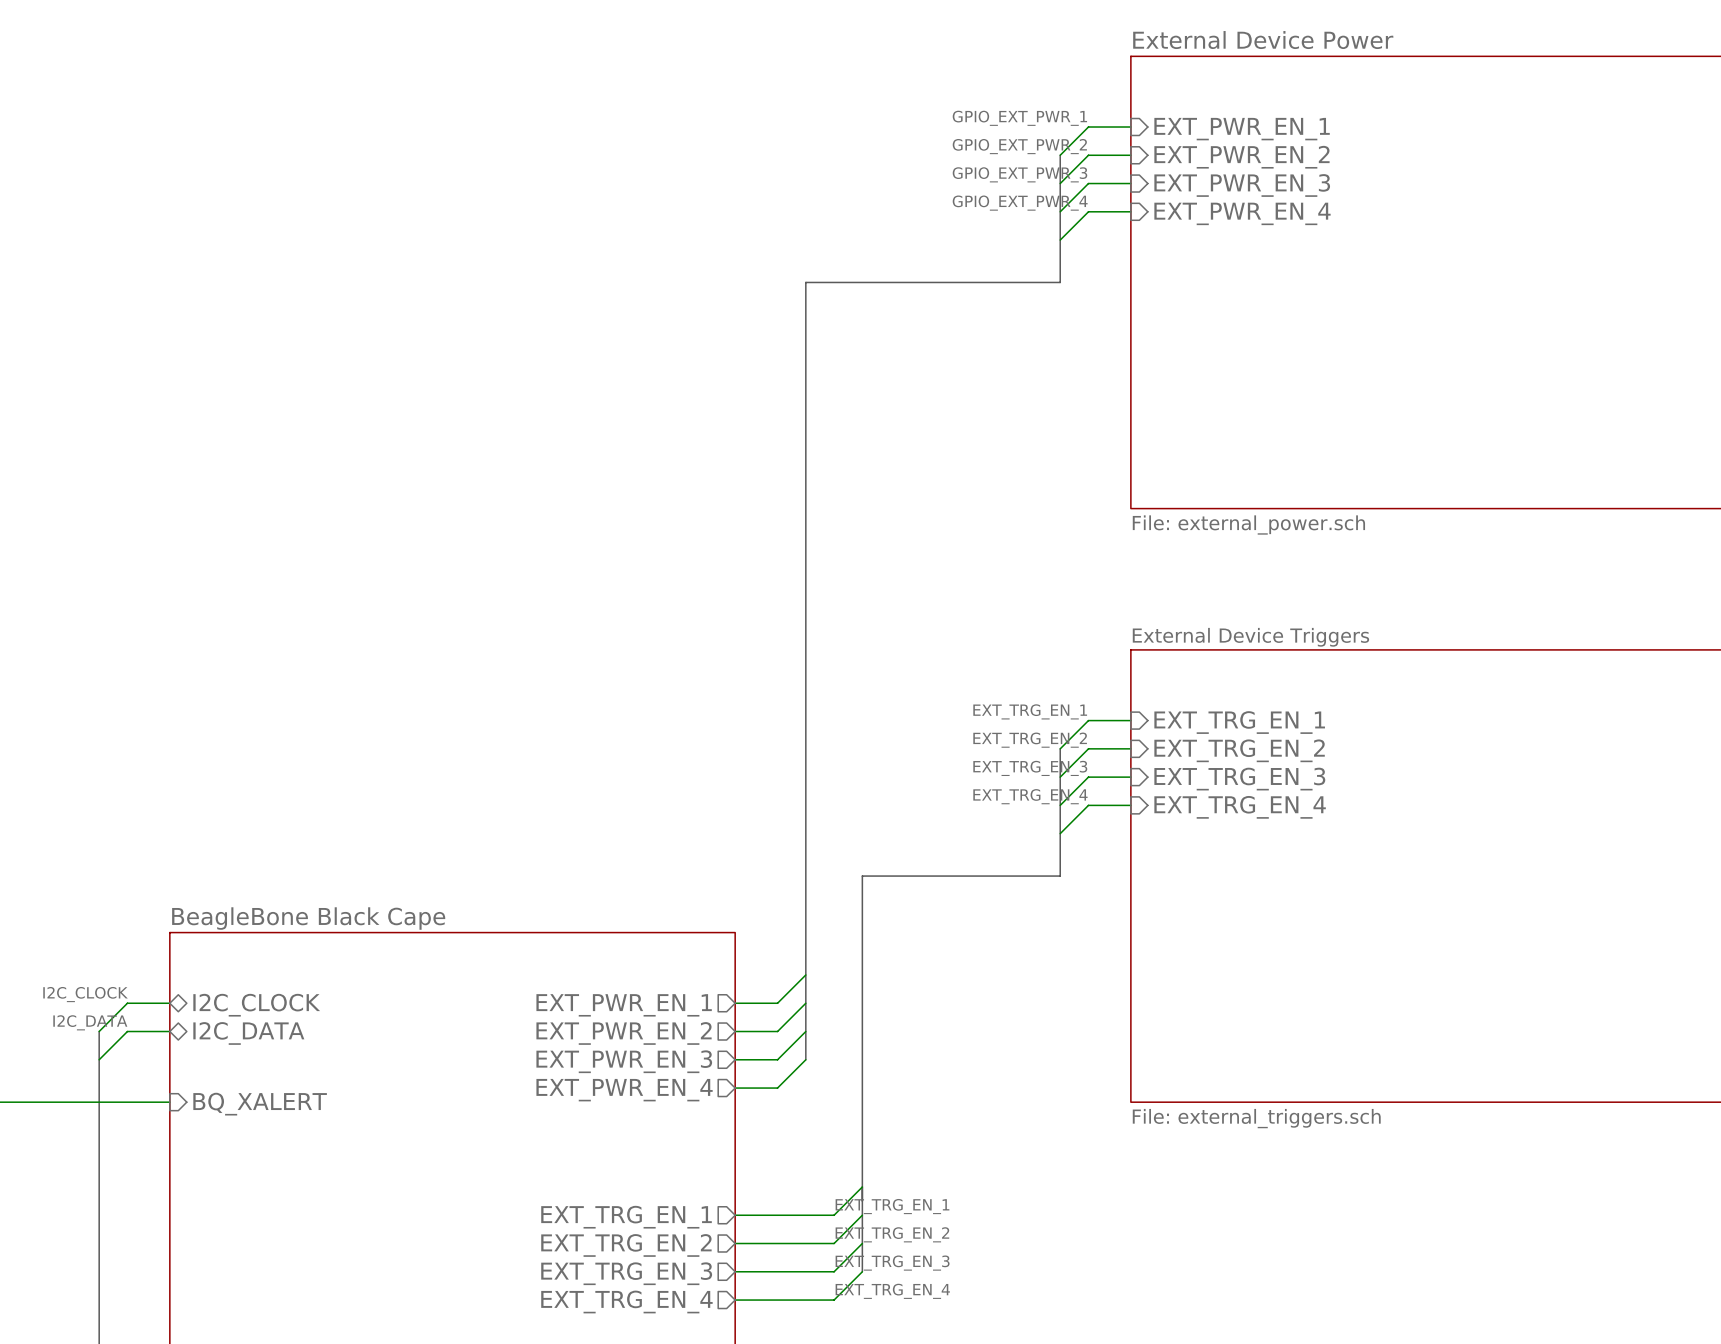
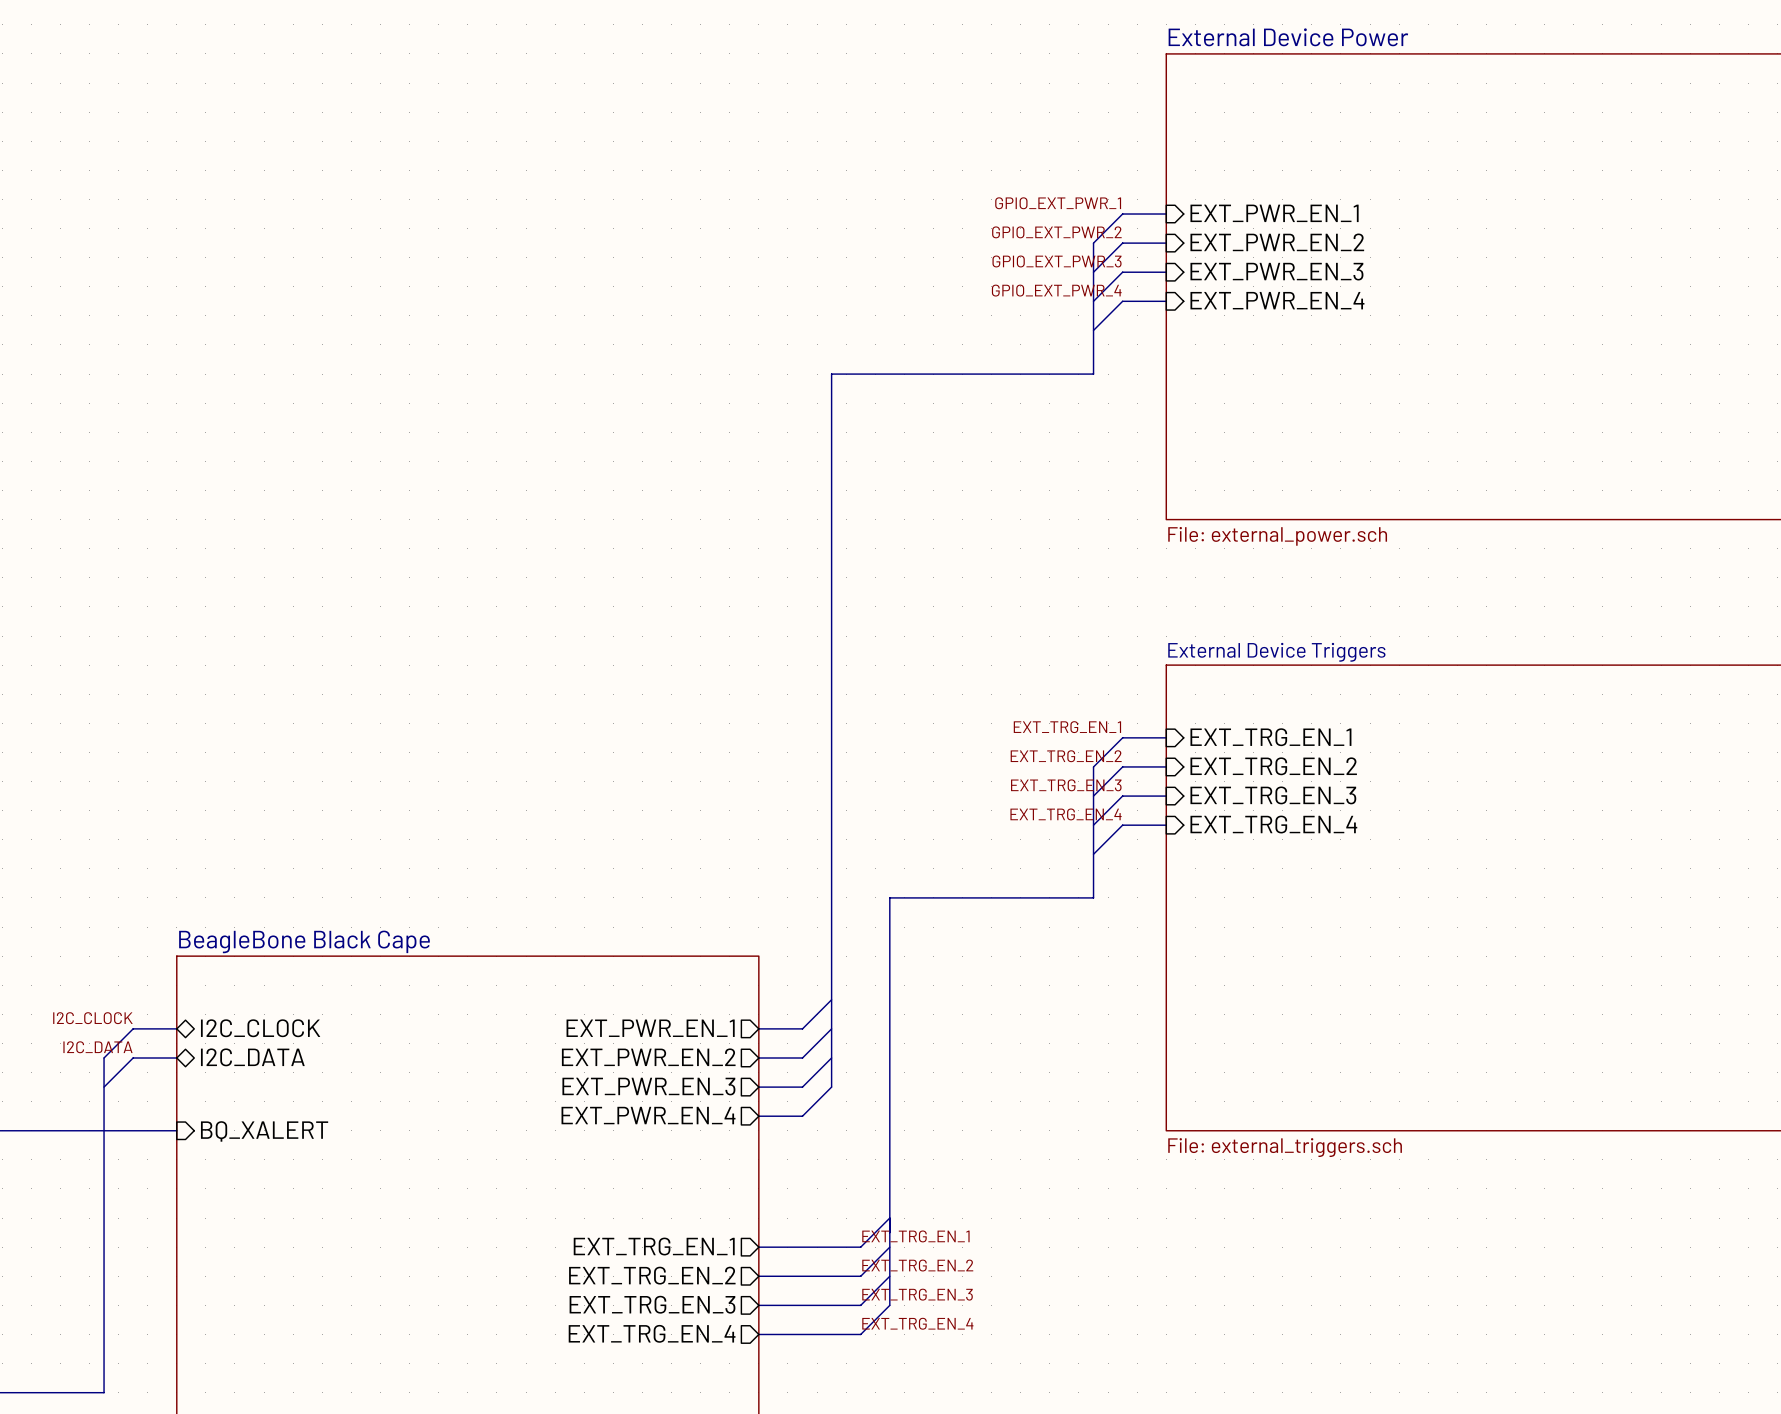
label: GPIO_EXT_PWR_1 (1019, 118) -> none
wire: (1130, 127) (1088, 127) (1060, 155) -> (1166, 243) (1122, 243) (1093, 272)
sheet pin: EXT_PWR_EN_1 (1242, 129) -> none
label position: GPIO_EXT_PWR_2 (1019, 146) -> GPIO_EXT_PWR_2 (1056, 232)
bus: (1060, 155) (1060, 240) -> none
wire: (1130, 155) (1088, 155) (1060, 183) -> (1166, 272) (1122, 272) (1093, 301)
sheet pin position: EXT_PWR_EN_2 (1241, 157) -> EXT_PWR_EN_2 (1277, 242)
label position: GPIO_EXT_PWR_3 (1019, 174) -> GPIO_EXT_PWR_3 (1057, 261)
wire: (1130, 183) (1088, 183) (1060, 211) -> (1166, 301) (1122, 301) (1093, 330)
sheet pin position: EXT_PWR_EN_3 (1242, 185) -> EXT_PWR_EN_3 (1276, 271)
label: GPIO_EXT_PWR_4 (1020, 203) -> GPIO_EXT_PWR_1 (1058, 203)
sheet pin: EXT_PWR_EN_4 (1242, 213) -> EXT_PWR_EN_1 (1274, 213)
bus: (1060, 282) (805, 282) (805, 367) -> (1093, 286) (1093, 374) (831, 374)
label: none -> GPIO_EXT_PWR_4 (1056, 290)
sheet pin: none -> EXT_PWR_EN_4 (1277, 300)

